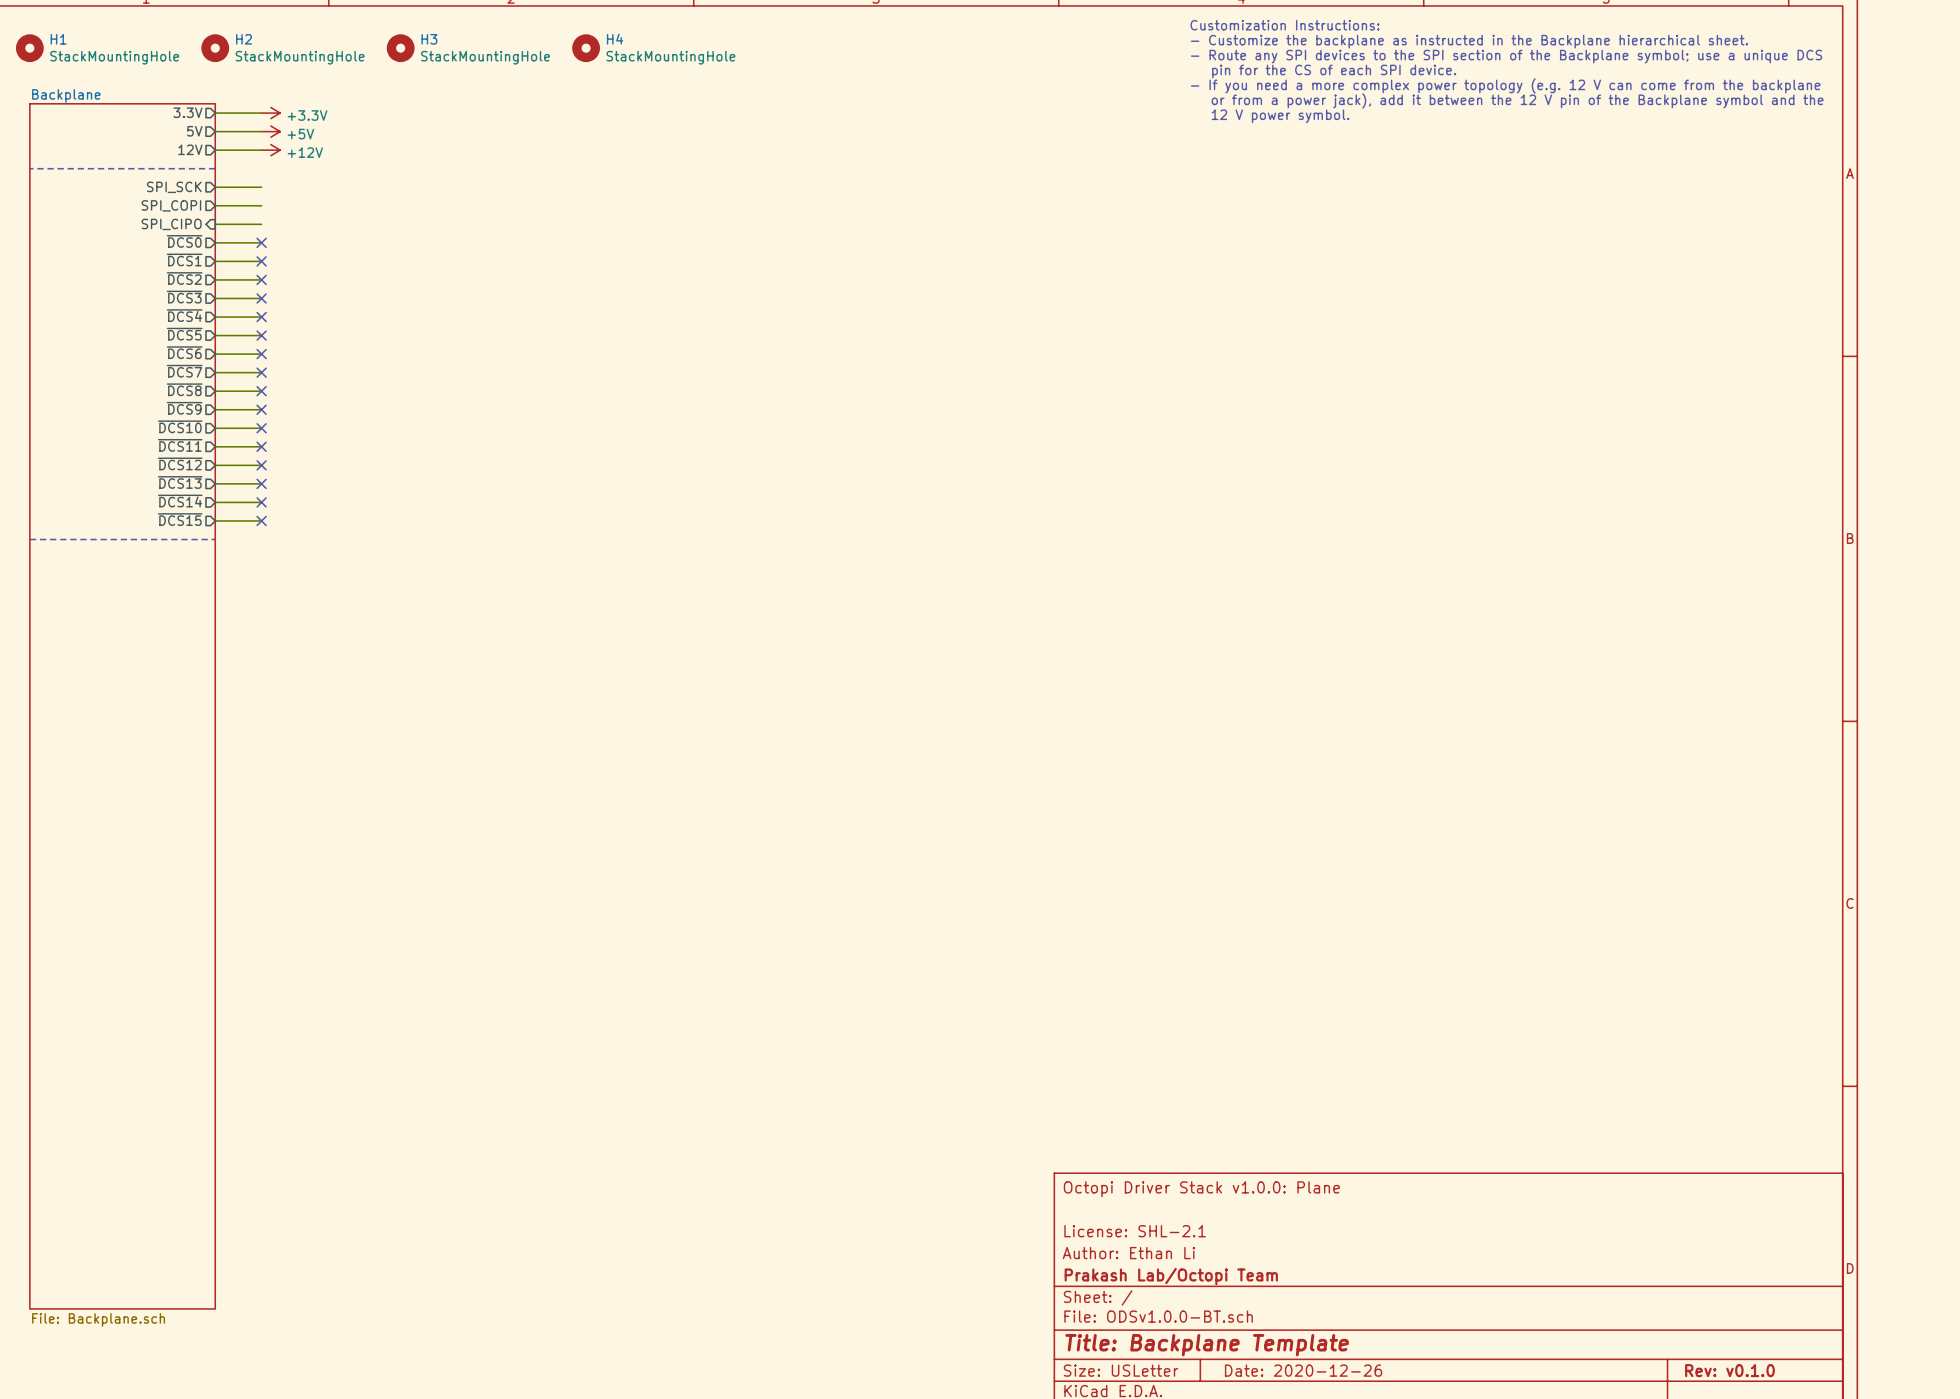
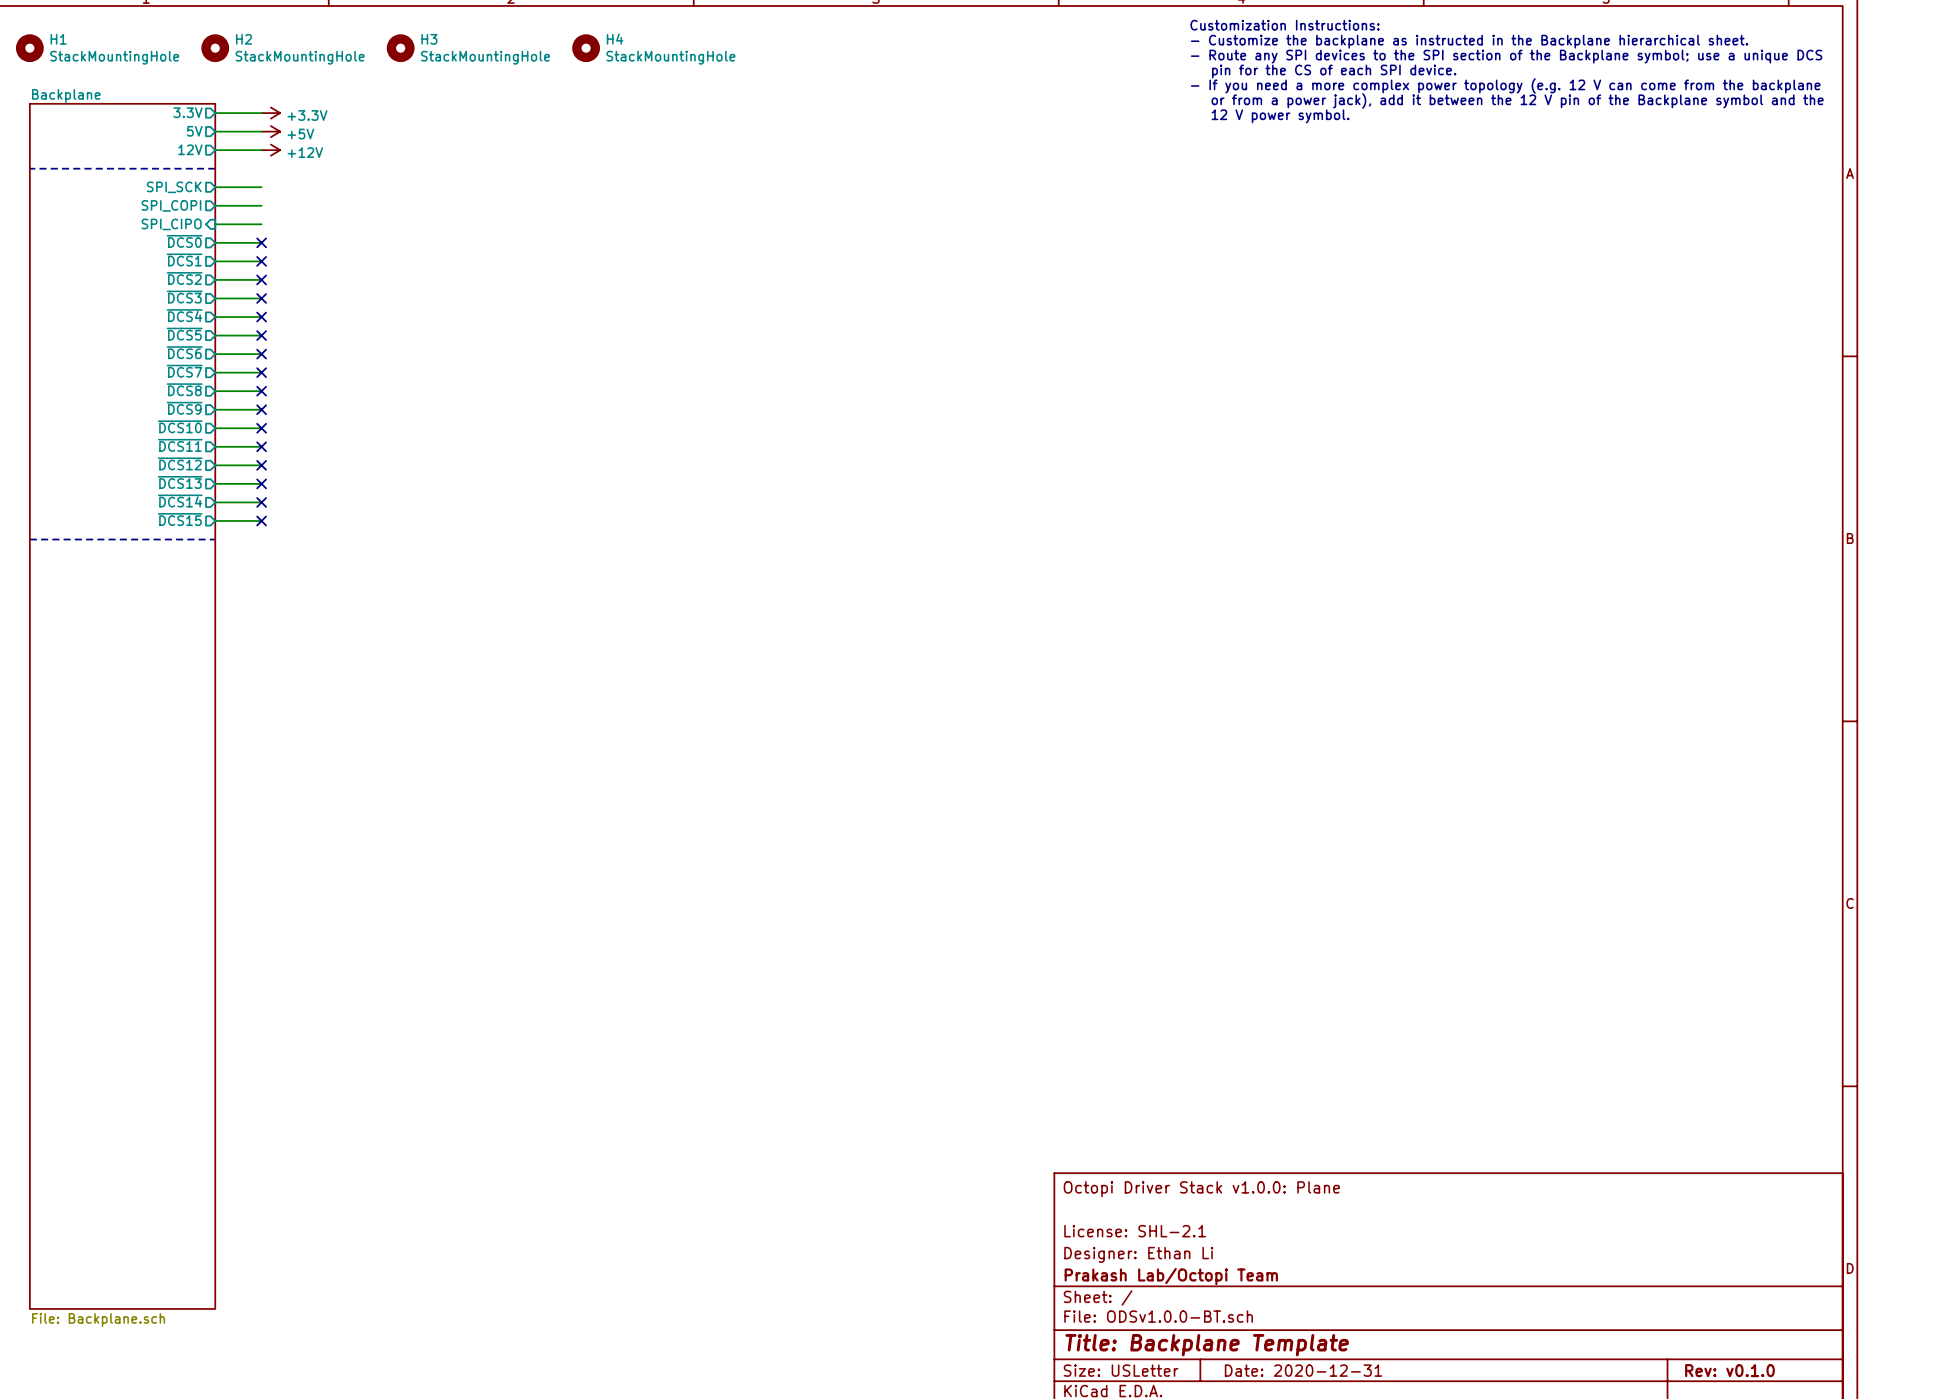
title block: Author: Ethan Li (1128, 1253) -> Designer: Ethan Li (1138, 1254)
title block: Date: 2020-12-26 (1303, 1370) -> Date: 2020-12-31 (1303, 1370)

